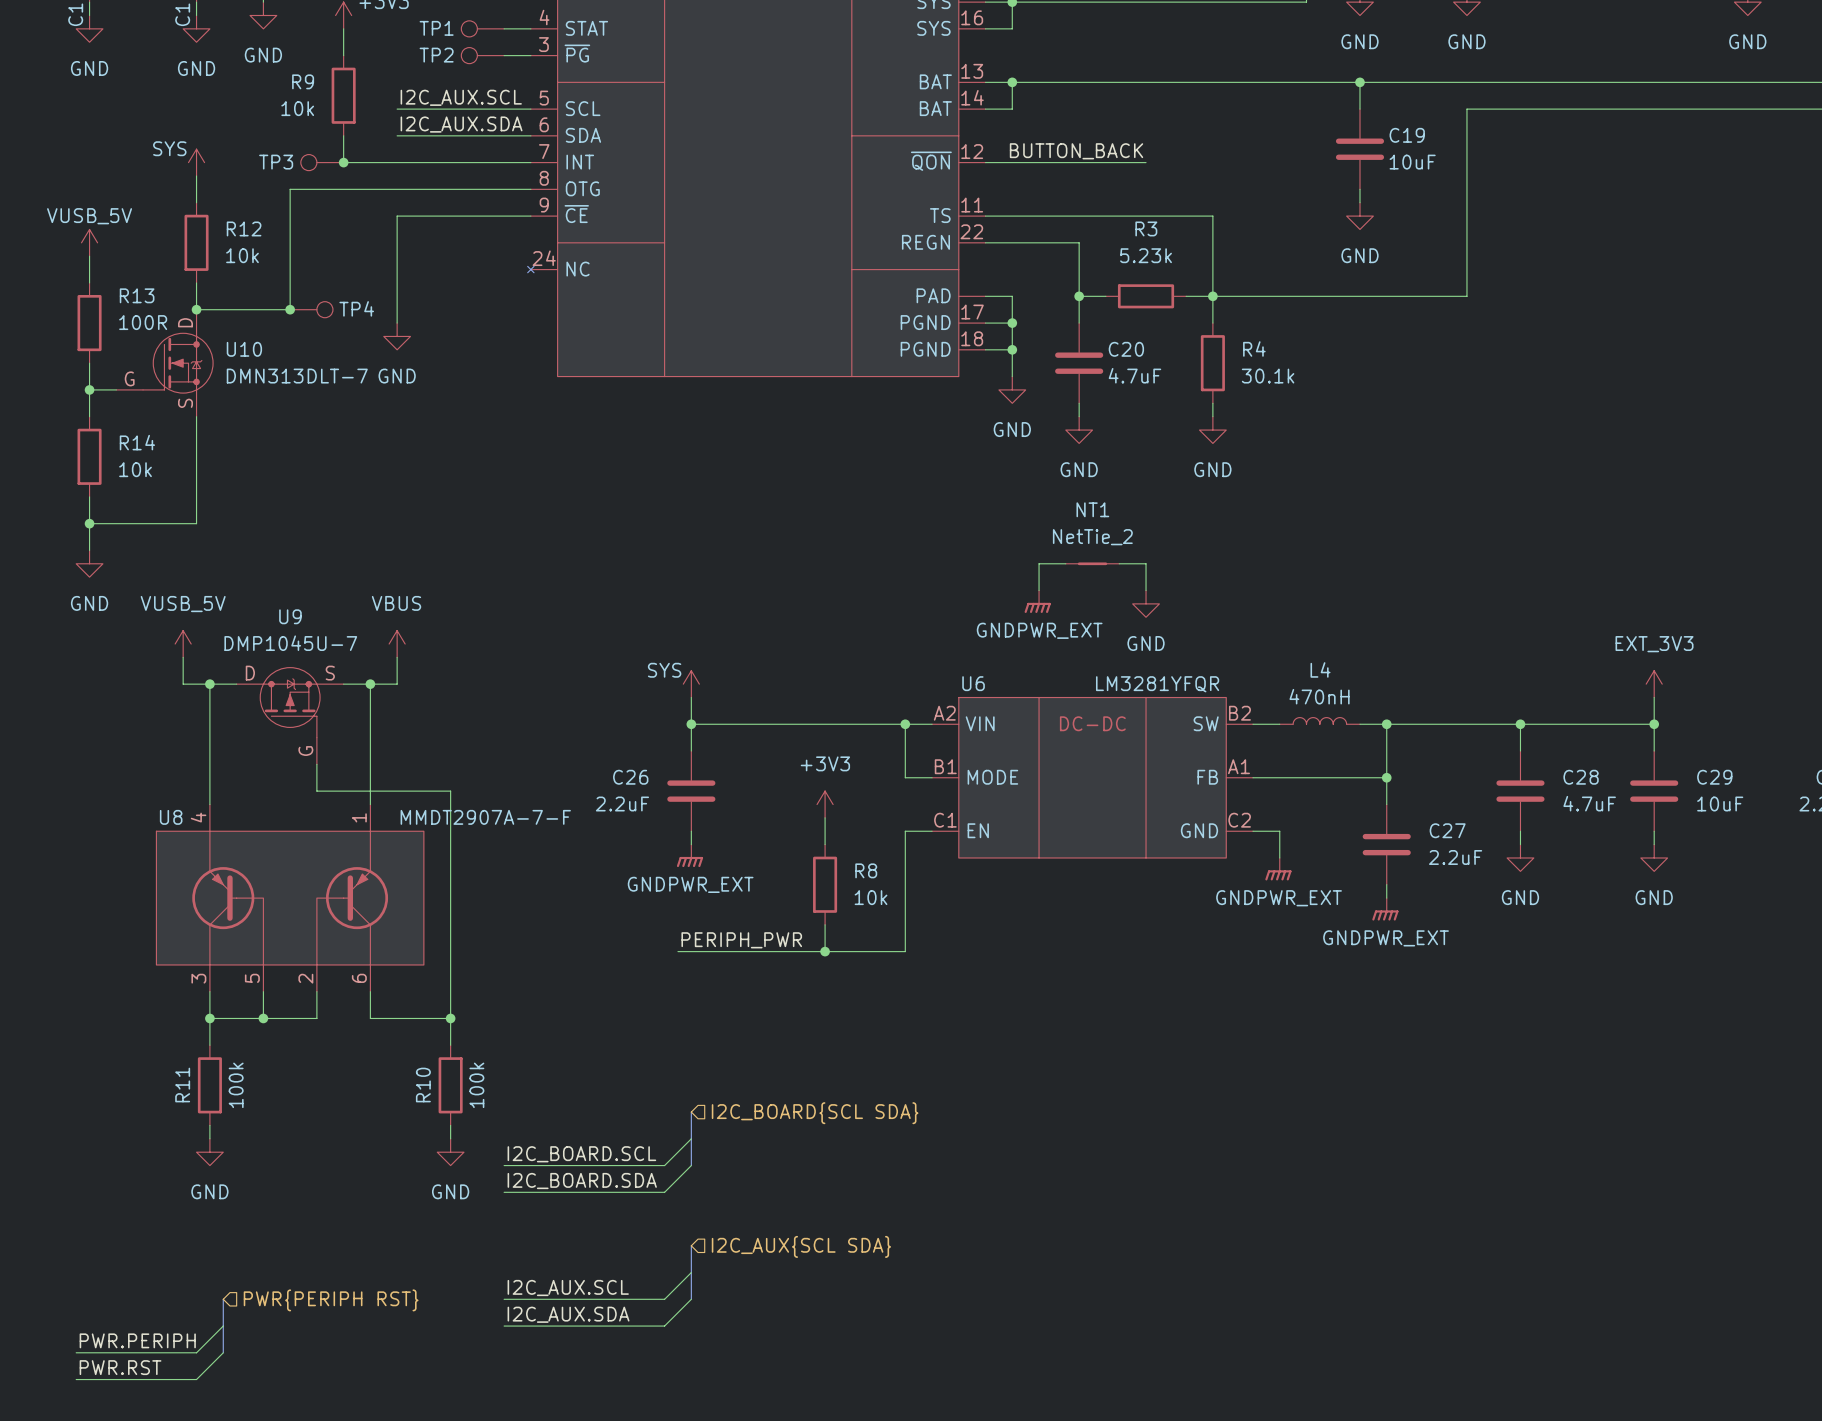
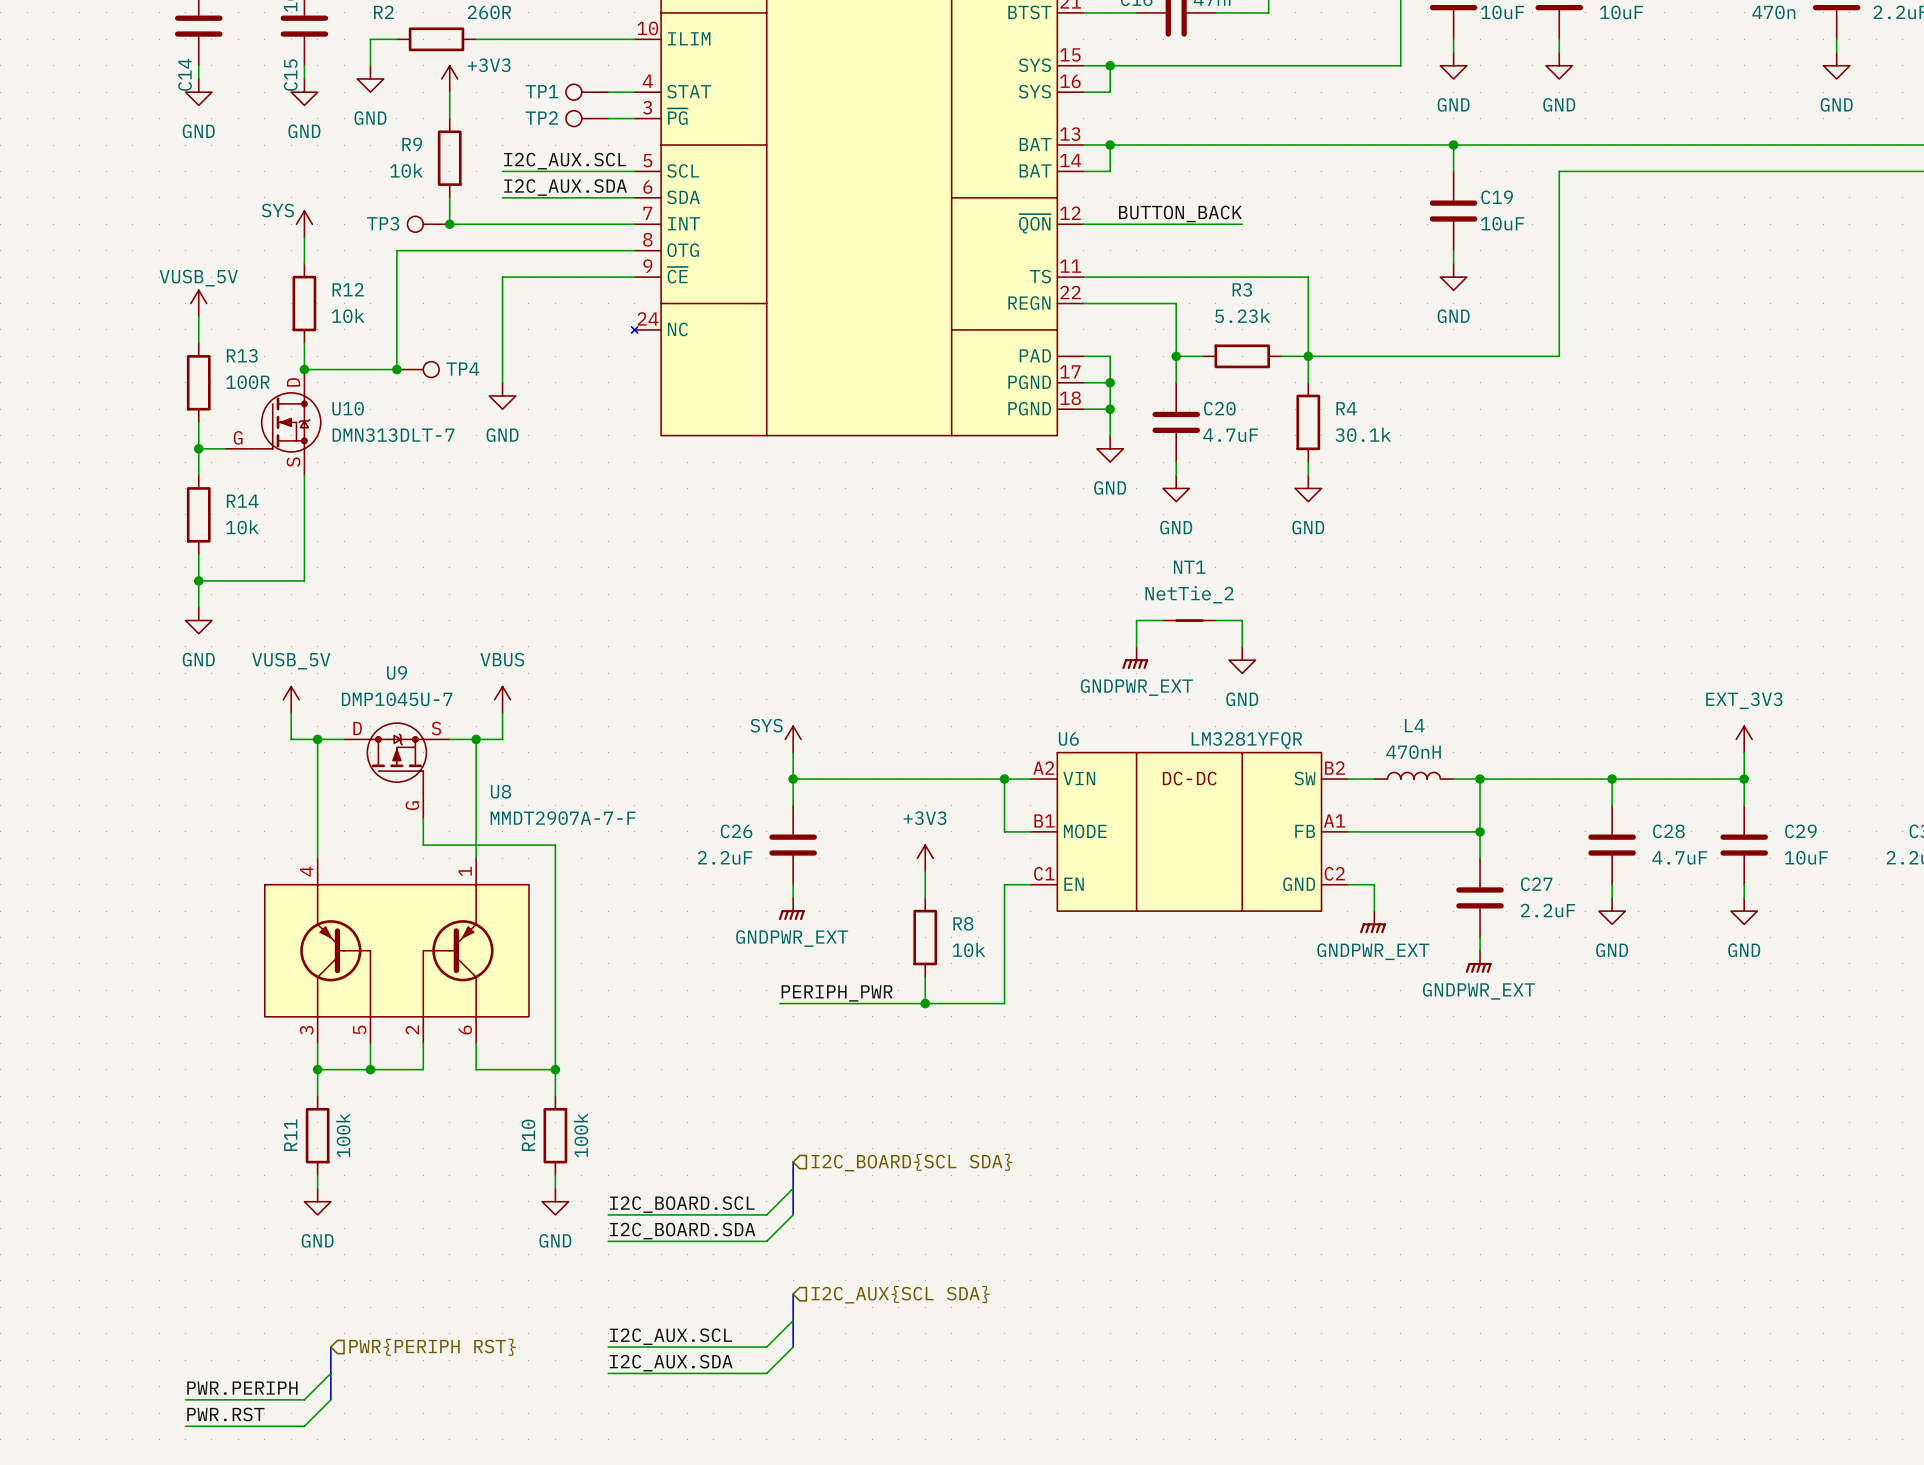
U8 name position: U8 (171, 817) -> U8 (500, 791)
U8 value position: MMDT2907A-7-F (485, 817) -> MMDT2907A-7-F (563, 818)

